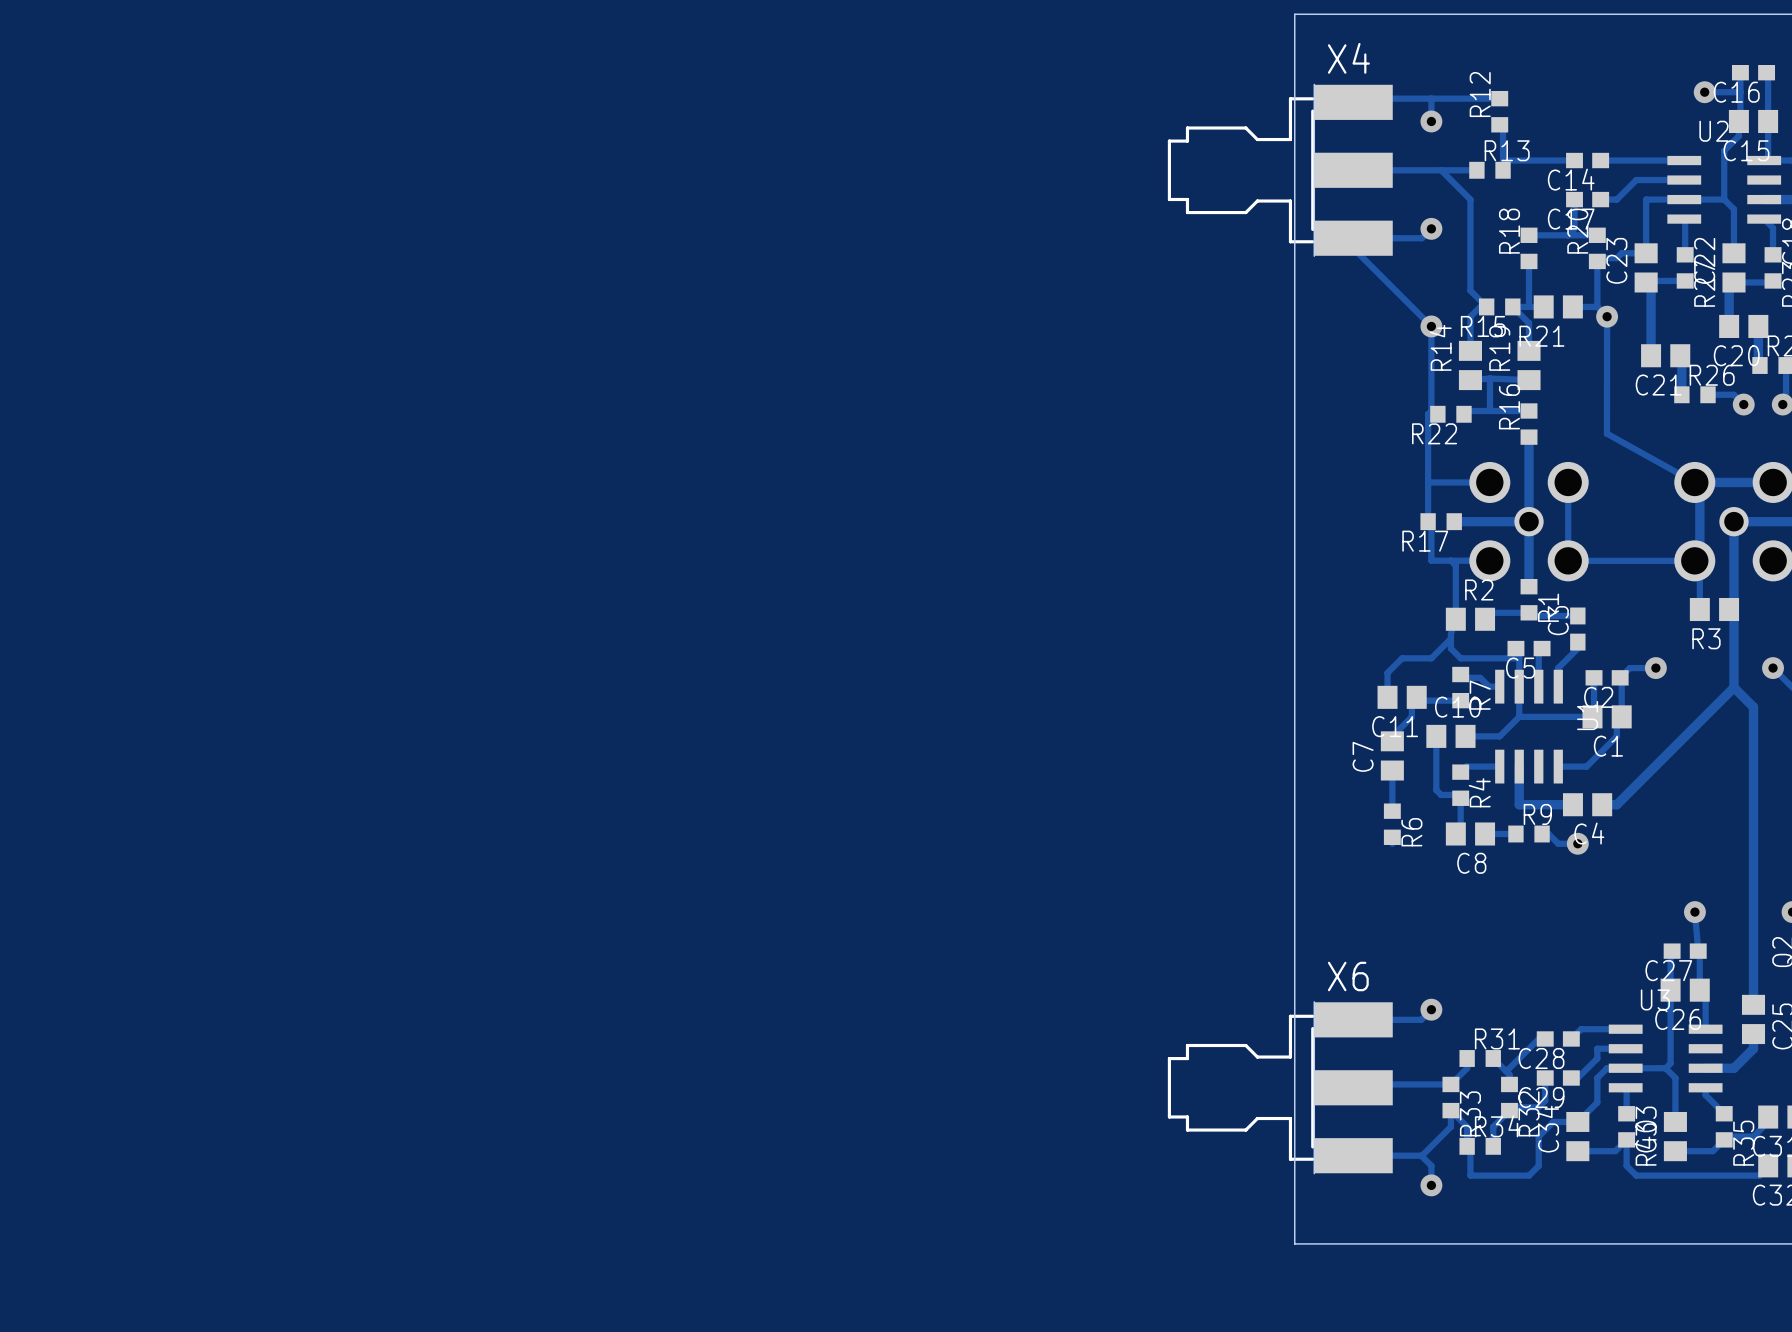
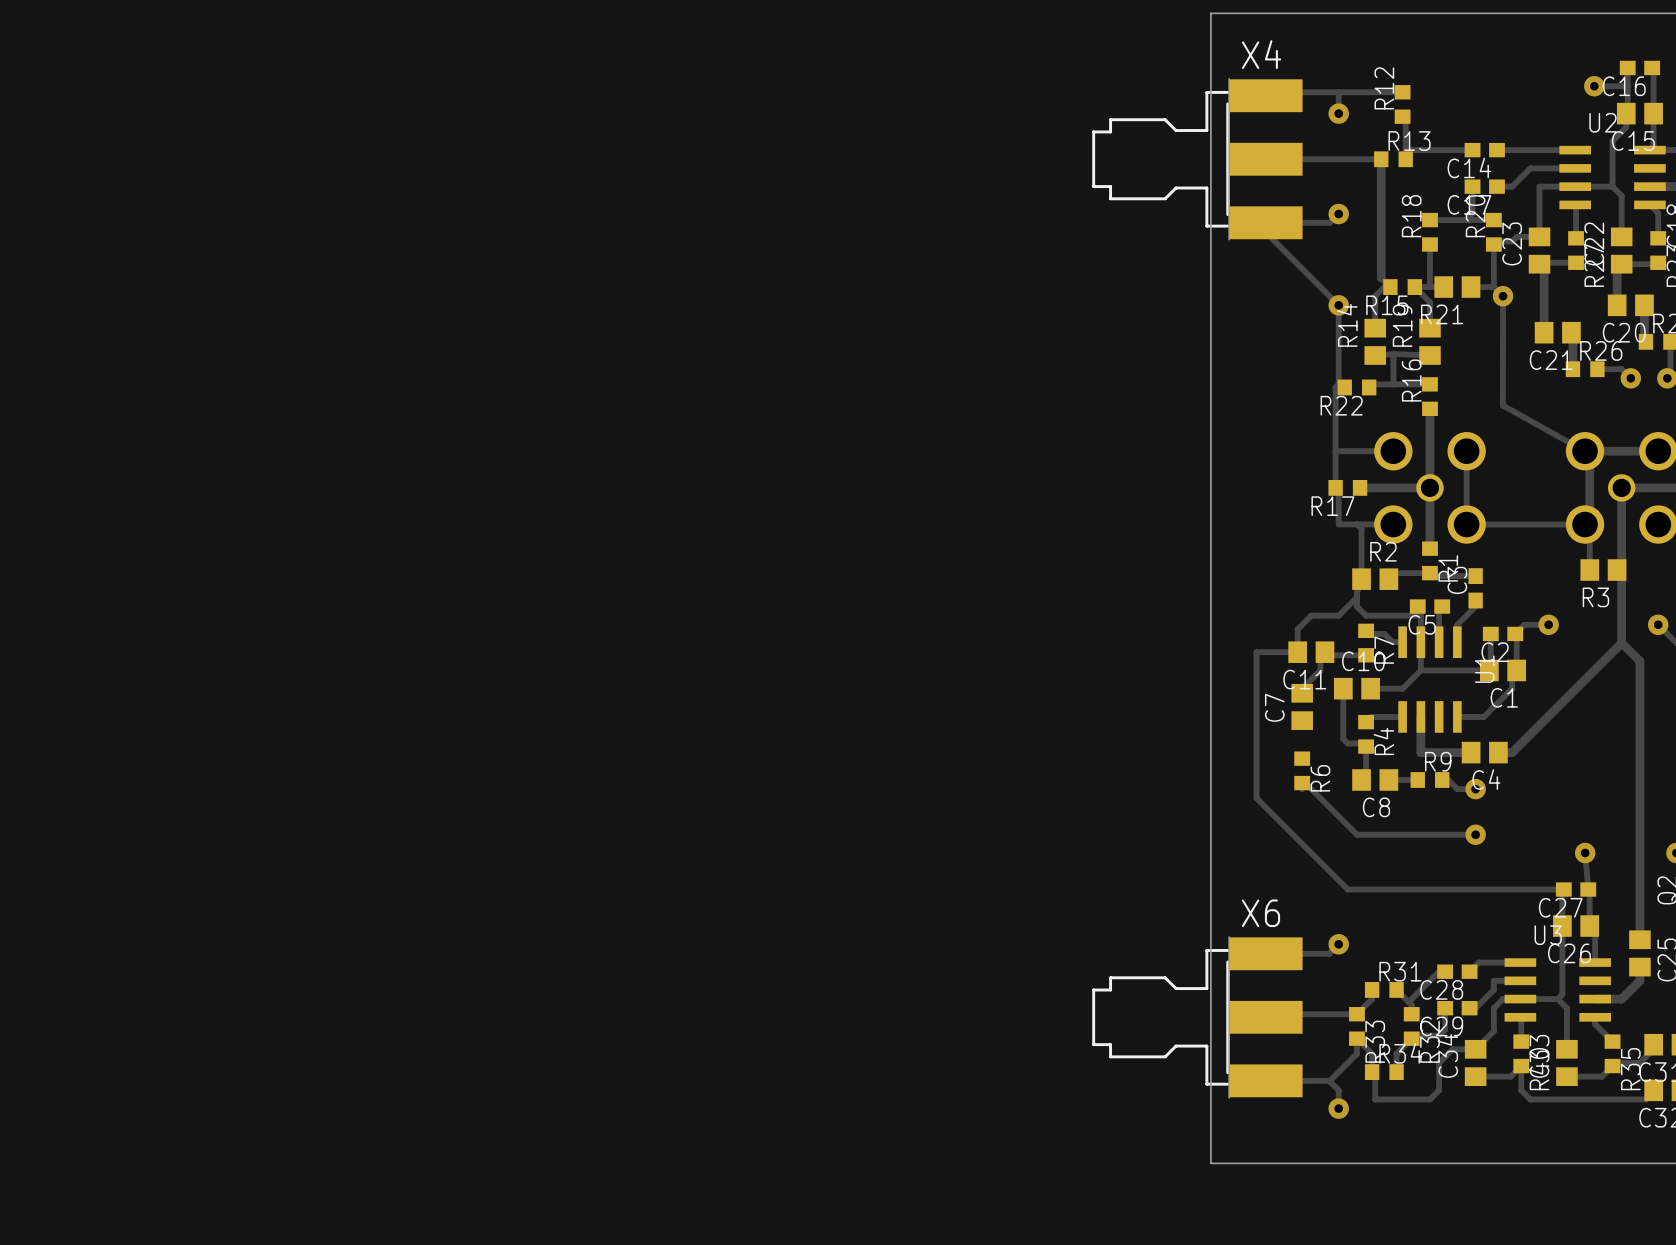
track: (1441, 170) (1470, 199) (1470, 290) (1476, 297) -> (1381, 159) (1381, 277)
track: none -> (1297, 652) (1256, 652) (1256, 798) (1347, 889) (1563, 889)
track: (1392, 770) (1392, 811) -> none
track: none -> (1302, 783) (1305, 783) (1356, 834) (1475, 834)
via: none -> (1475, 834)

